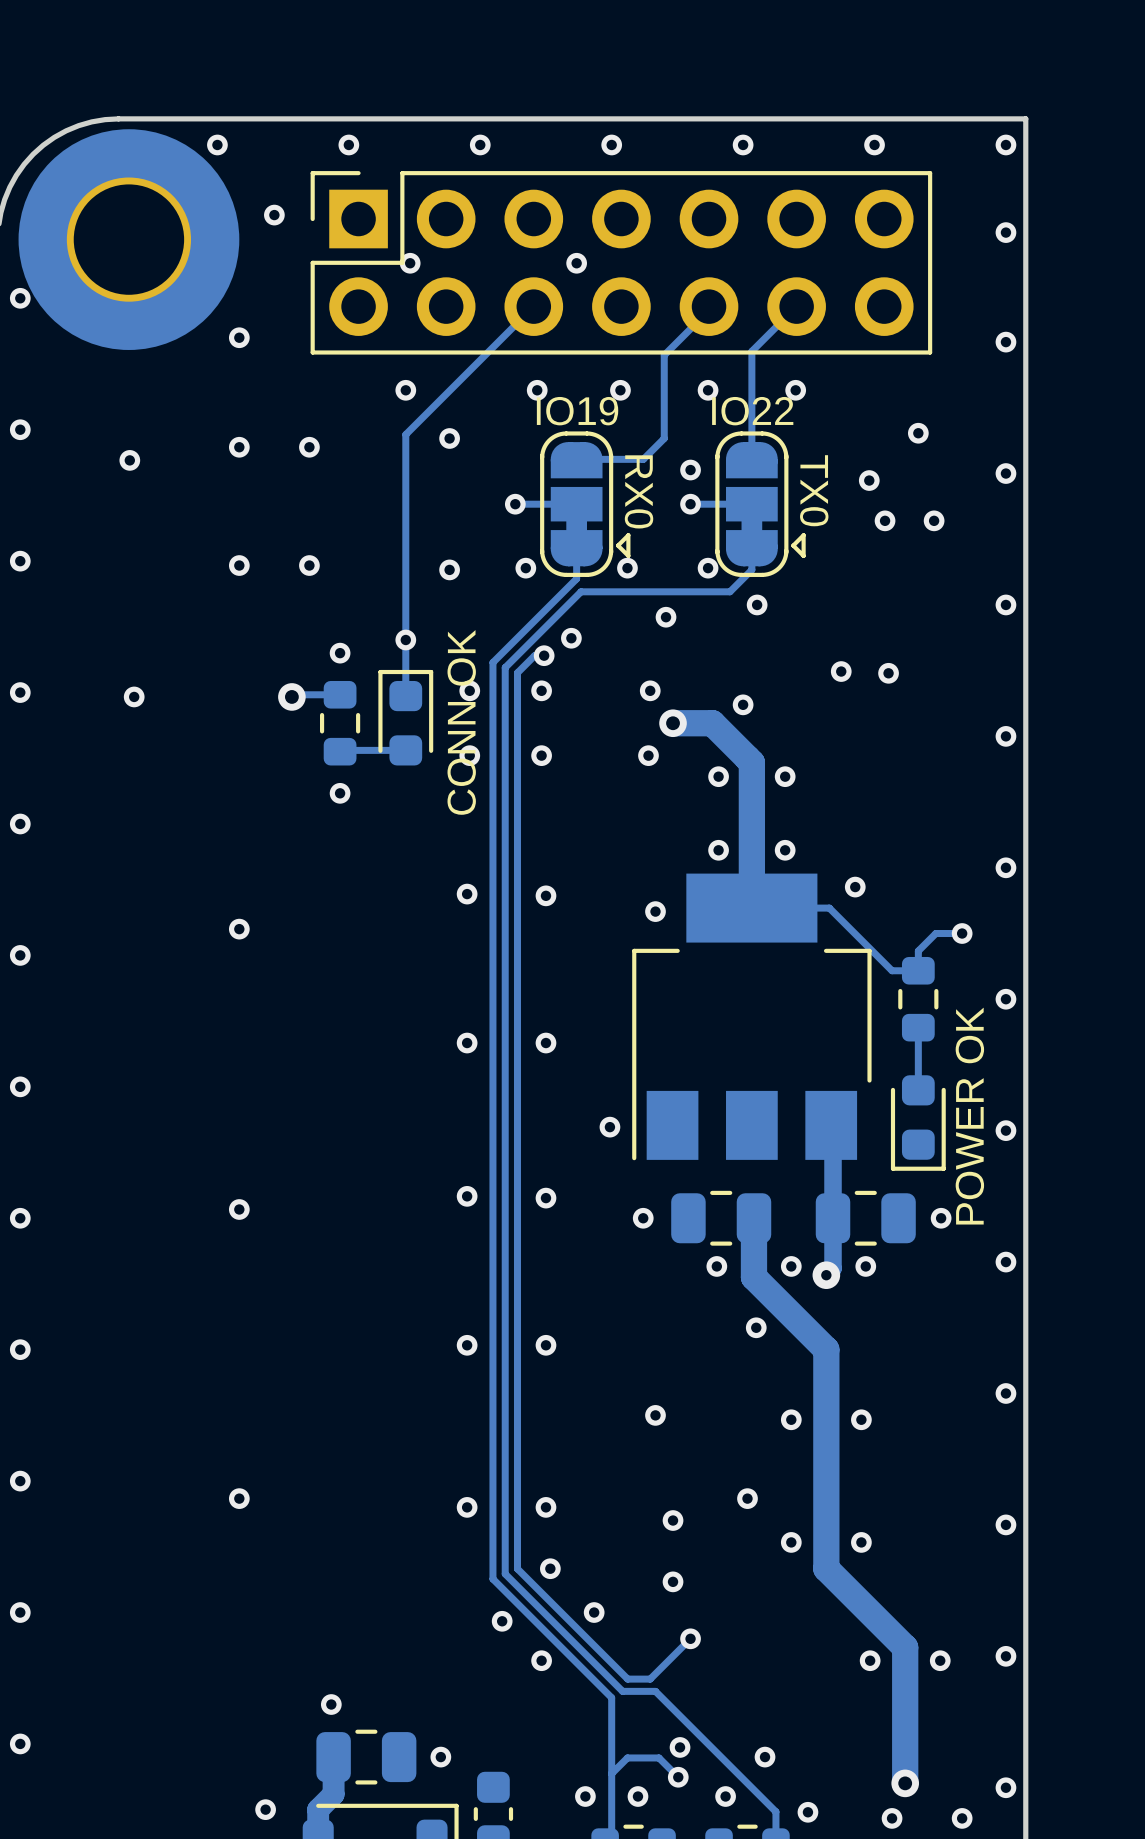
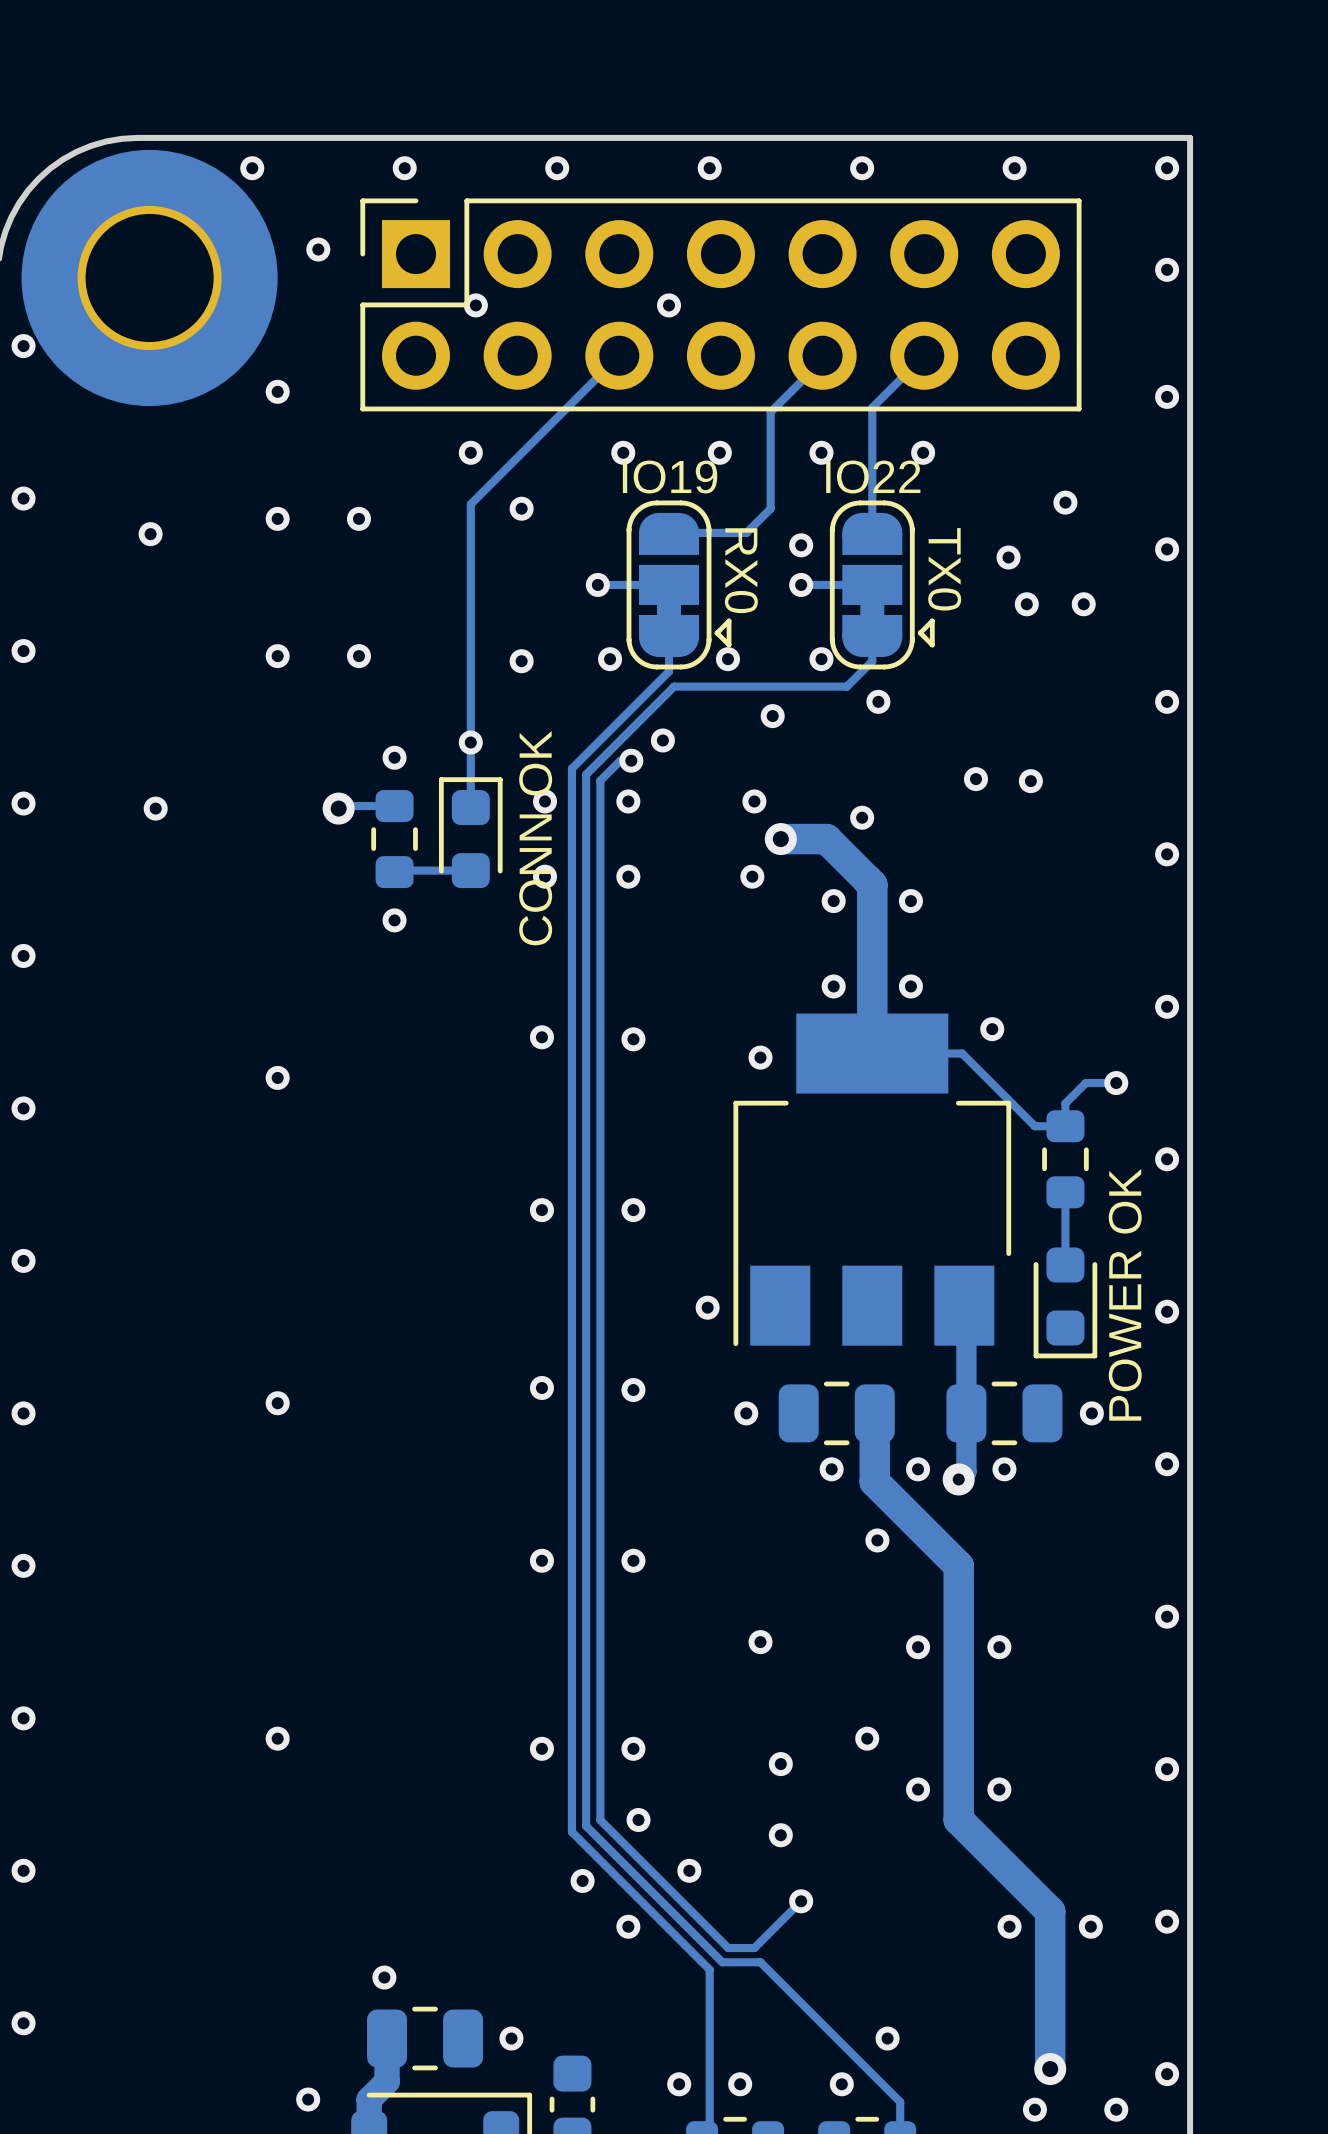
via: (680, 1747) -> none
track: (611, 1773) (627, 1757) (659, 1757) (678, 1777) -> none
via: (678, 1777) -> none
via: (807, 1812) -> none

